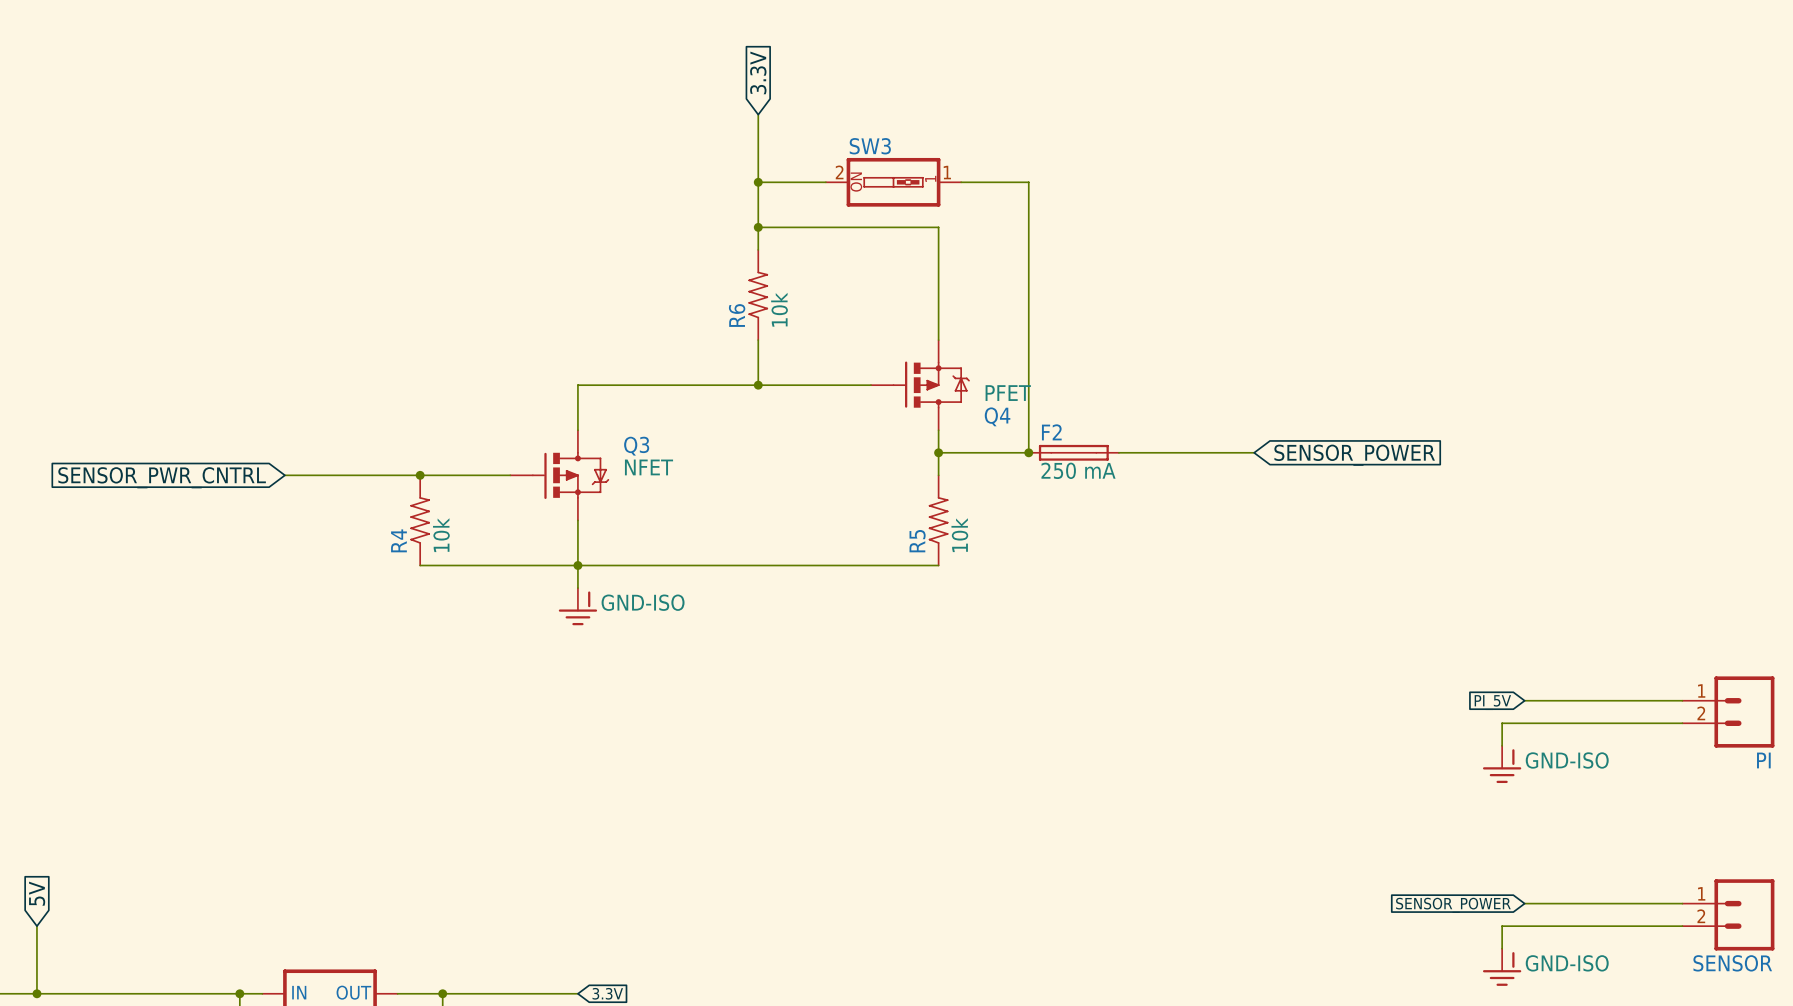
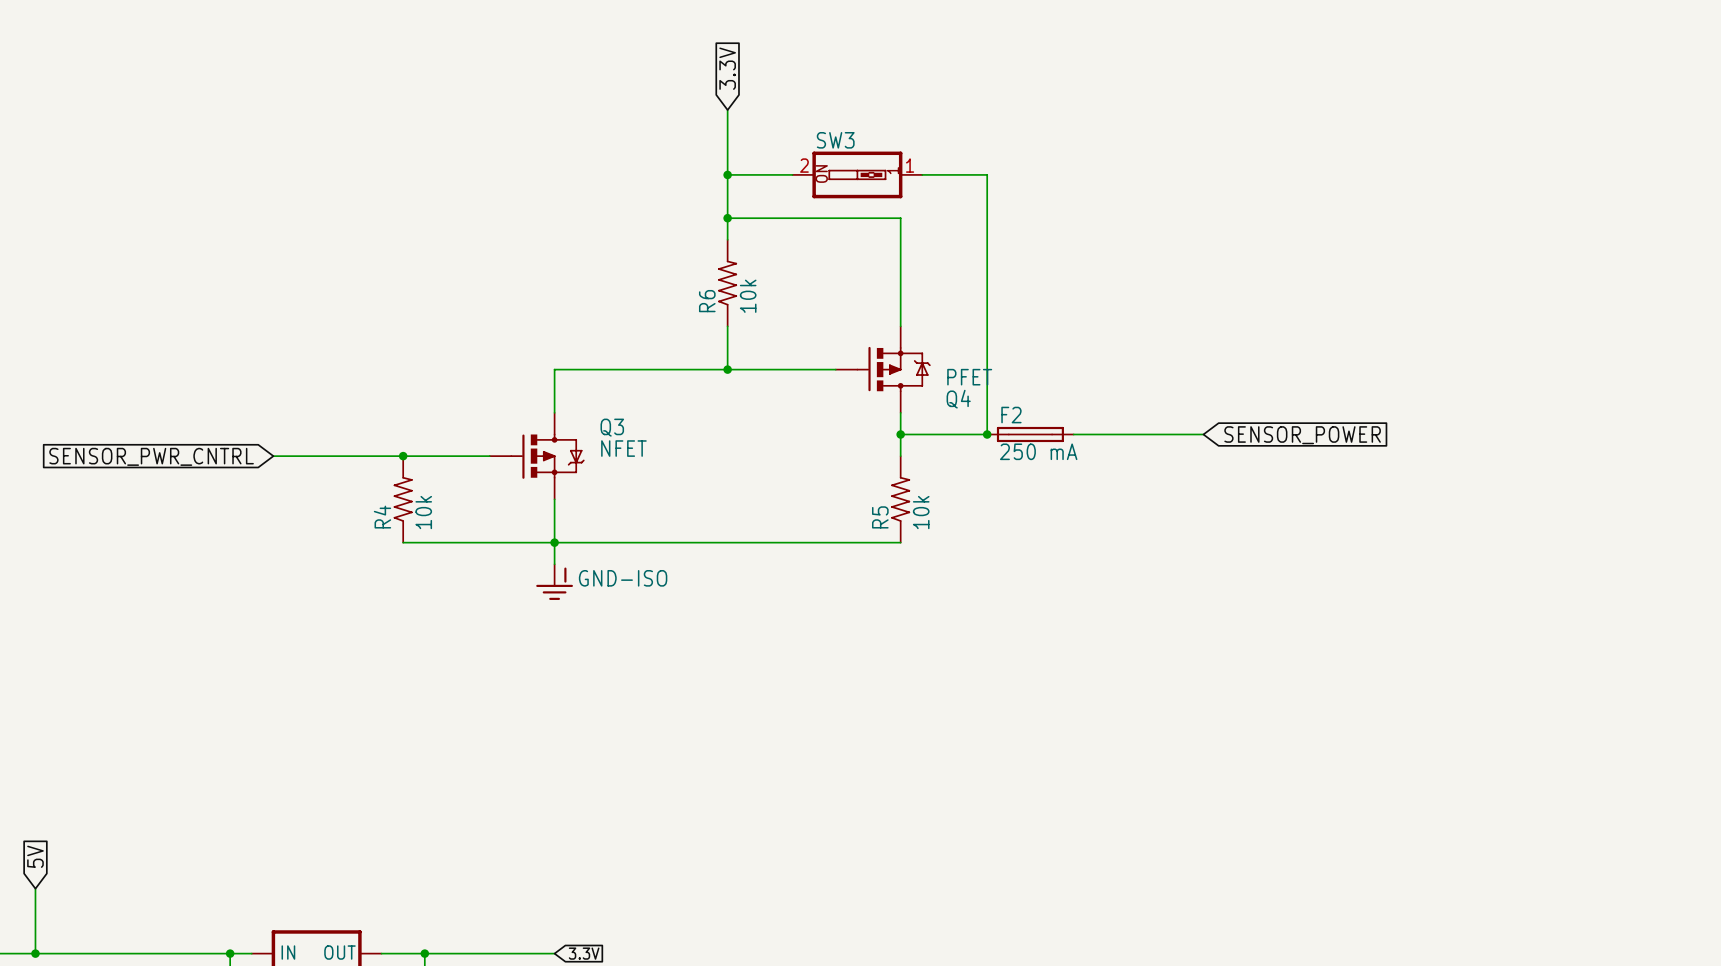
wire: (1524, 700) (1682, 700) -> none
global label: PI_5V (1492, 702) -> none
PI: (1728, 712) -> none
wire: (1682, 723) (1502, 723) (1502, 745) -> none
power symbol: GND-ISO (1502, 764) -> none
wire: (1524, 903) (1682, 903) -> none
global label: SENSOR_POWER (1453, 905) -> none
SENSOR: (1728, 914) -> none
wire: (1682, 926) (1502, 926) (1502, 948) -> none
power symbol: GND-ISO (1502, 967) -> none

